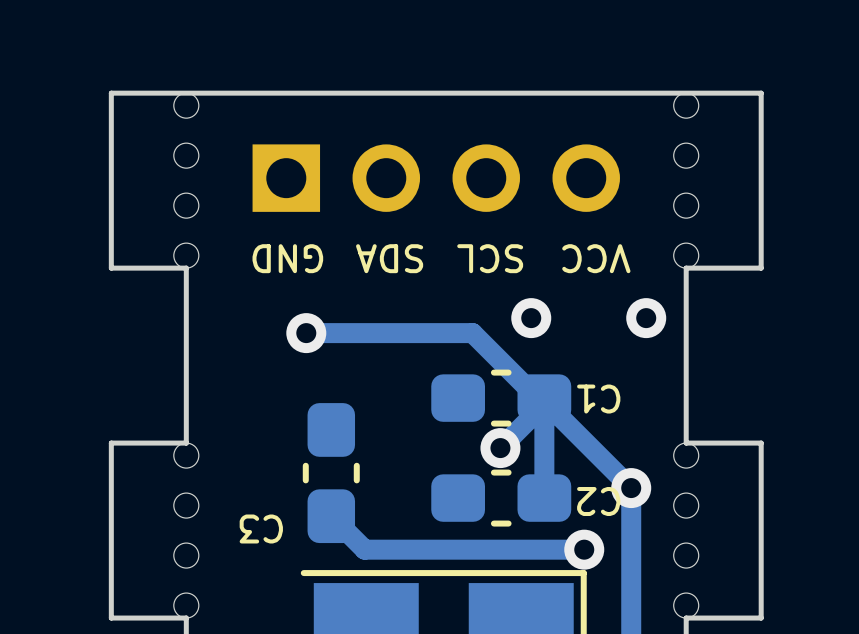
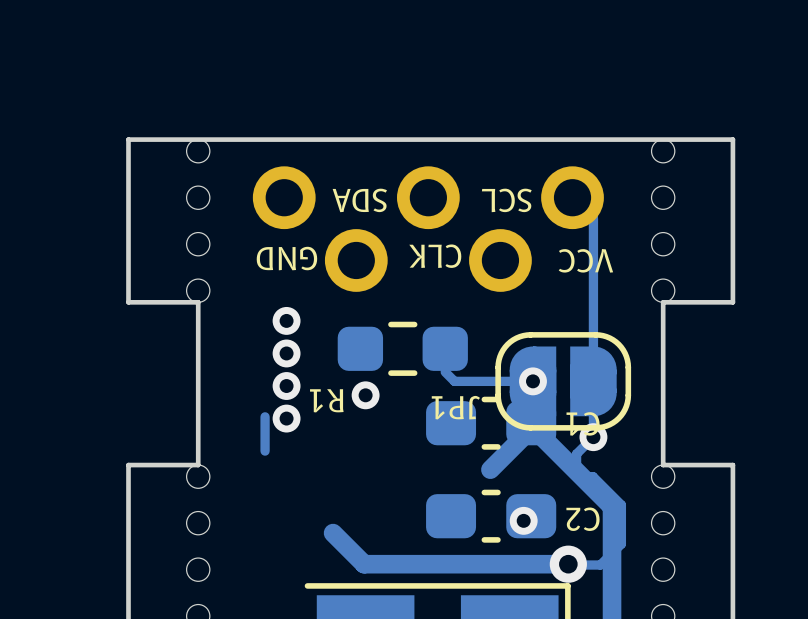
part footprint: [252, 144, 620, 212] -> [252, 166, 604, 292]
track: none -> (572, 197) (593, 218) (593, 437) (576, 454) (576, 476) (593, 476) (621, 504) (621, 544) (600, 565) (576, 565)
text: none -> CLK (435, 256)
text position: GND (287, 258) -> GND (286, 258)
text position: SDA (389, 258) -> SDA (359, 200)
text position: SCL (490, 258) -> SCL (506, 200)
text position: VCC (596, 258) -> VCC (585, 260)
via: none -> (286, 320)
R1: none -> (402, 348)
via position: (531, 318) -> (532, 381)
via: (646, 318) -> none
via: none -> (286, 353)
track: (306, 333) (472, 333) (537, 398) -> none
via: (306, 333) -> none
track: none -> (445, 372) (454, 381) (532, 381)
JP1: none -> (563, 381)
via: none -> (286, 386)
via: none -> (365, 395)
track: none -> (265, 416) (265, 451)
via: none -> (286, 418)
track: (544, 404) (544, 498) -> none
via: none -> (593, 437)
via: (500, 448) -> none
C3: (331, 473) -> none
via: (631, 488) -> none
via: none -> (523, 520)

